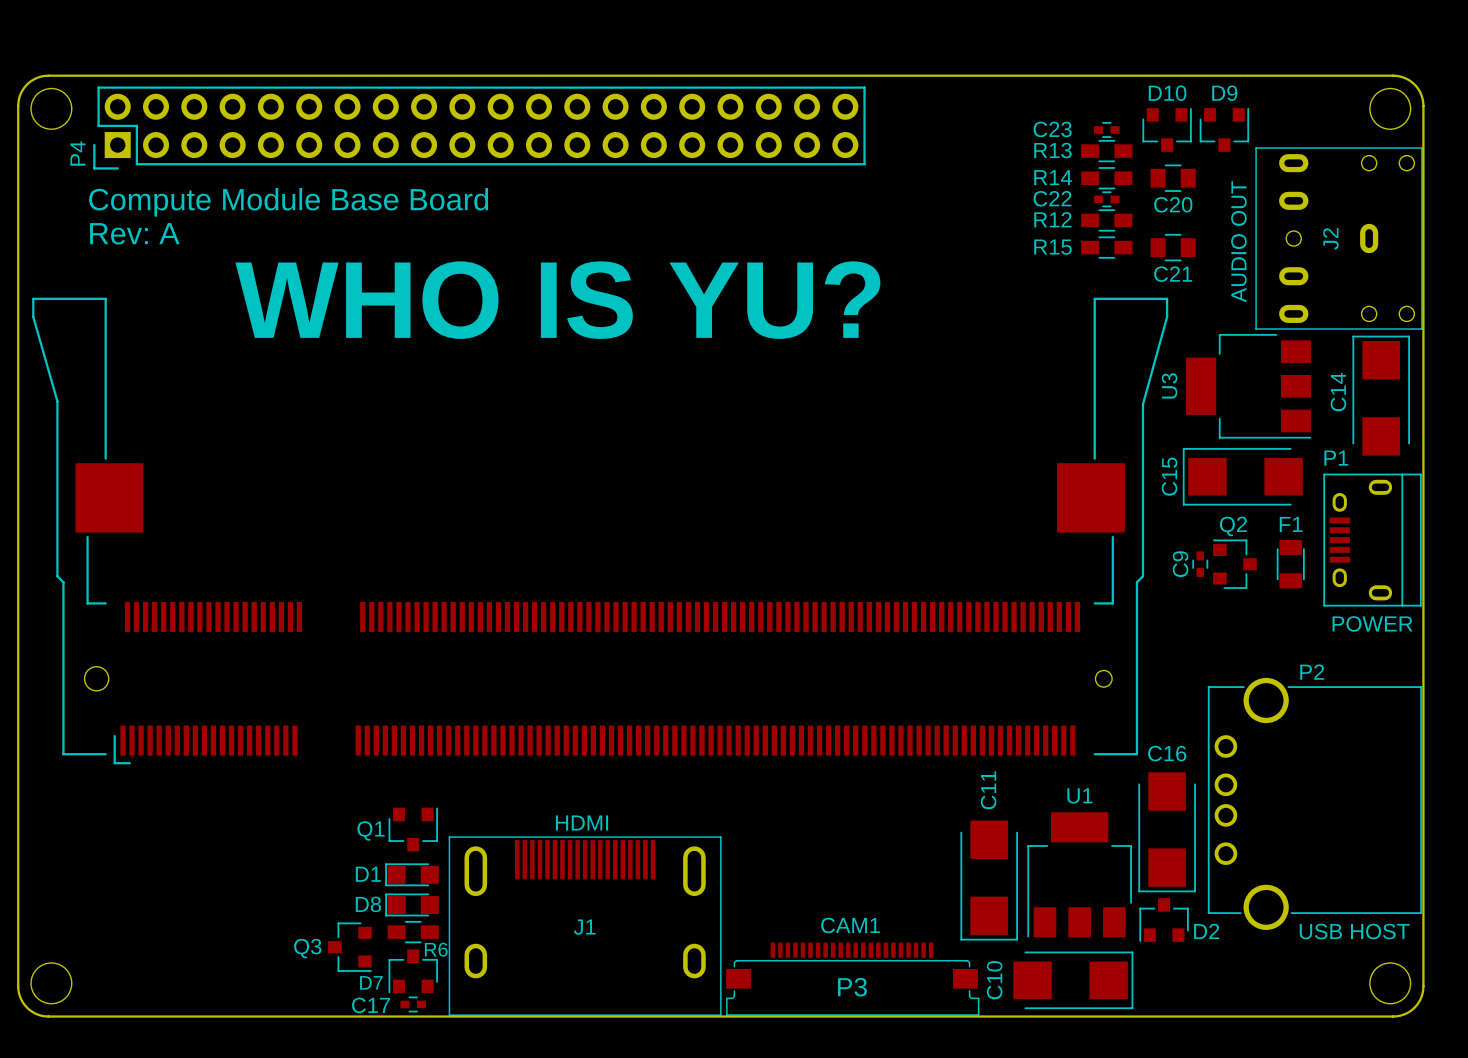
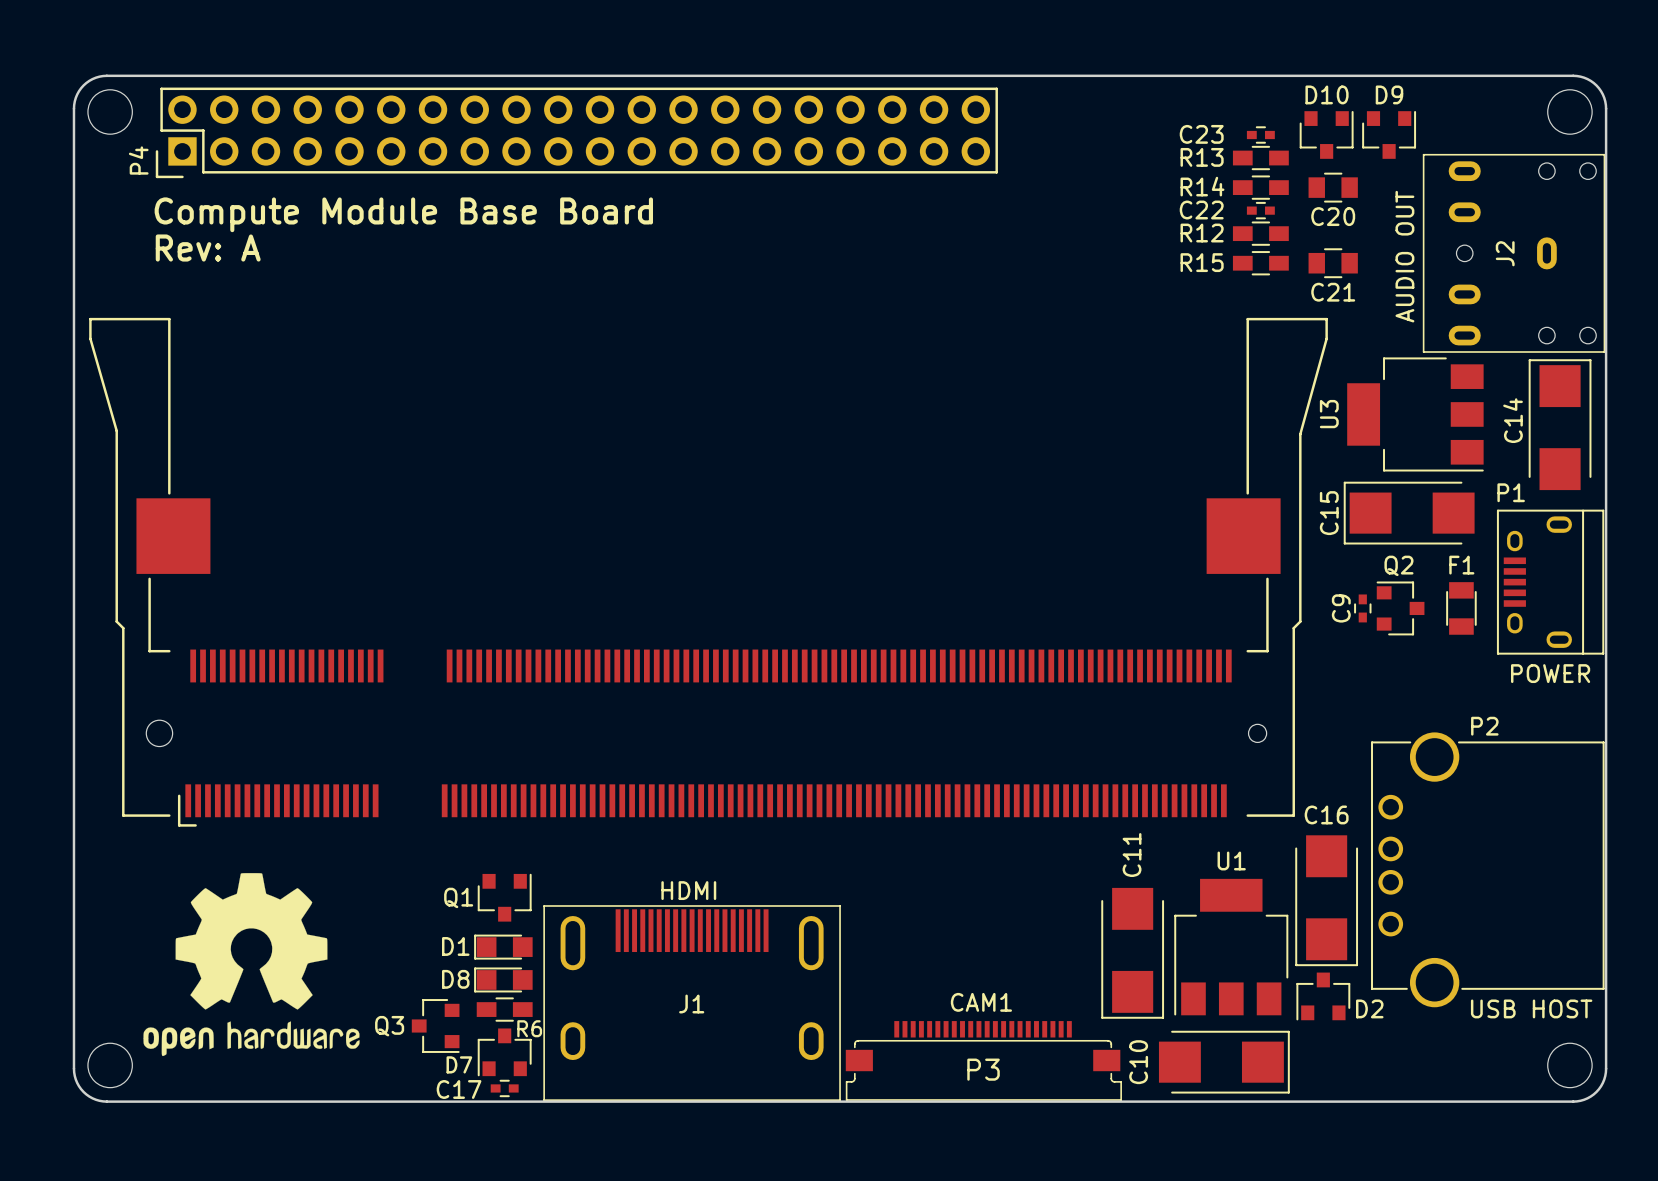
text: WHO IS YU? (557, 300) -> none
drawing: none -> [143, 873, 360, 1057]

